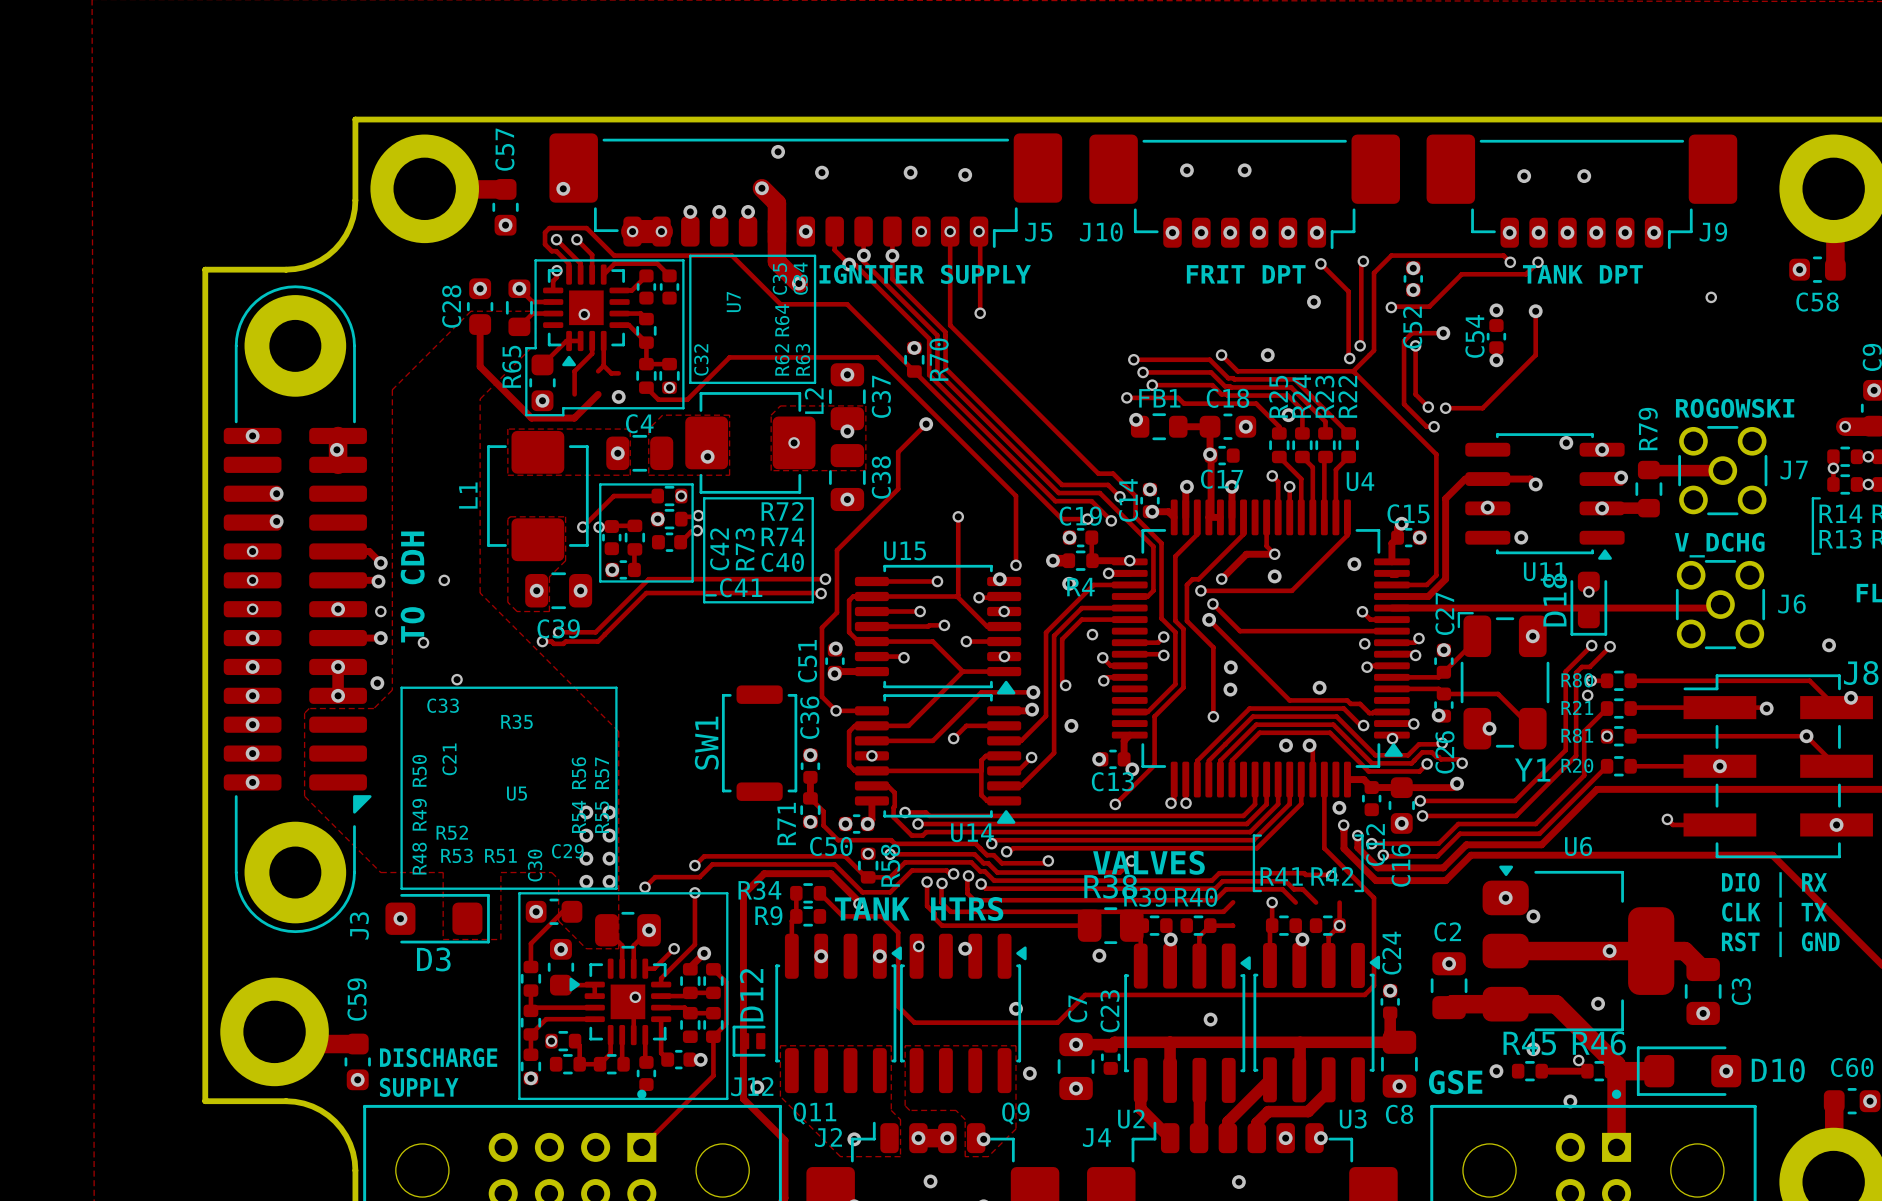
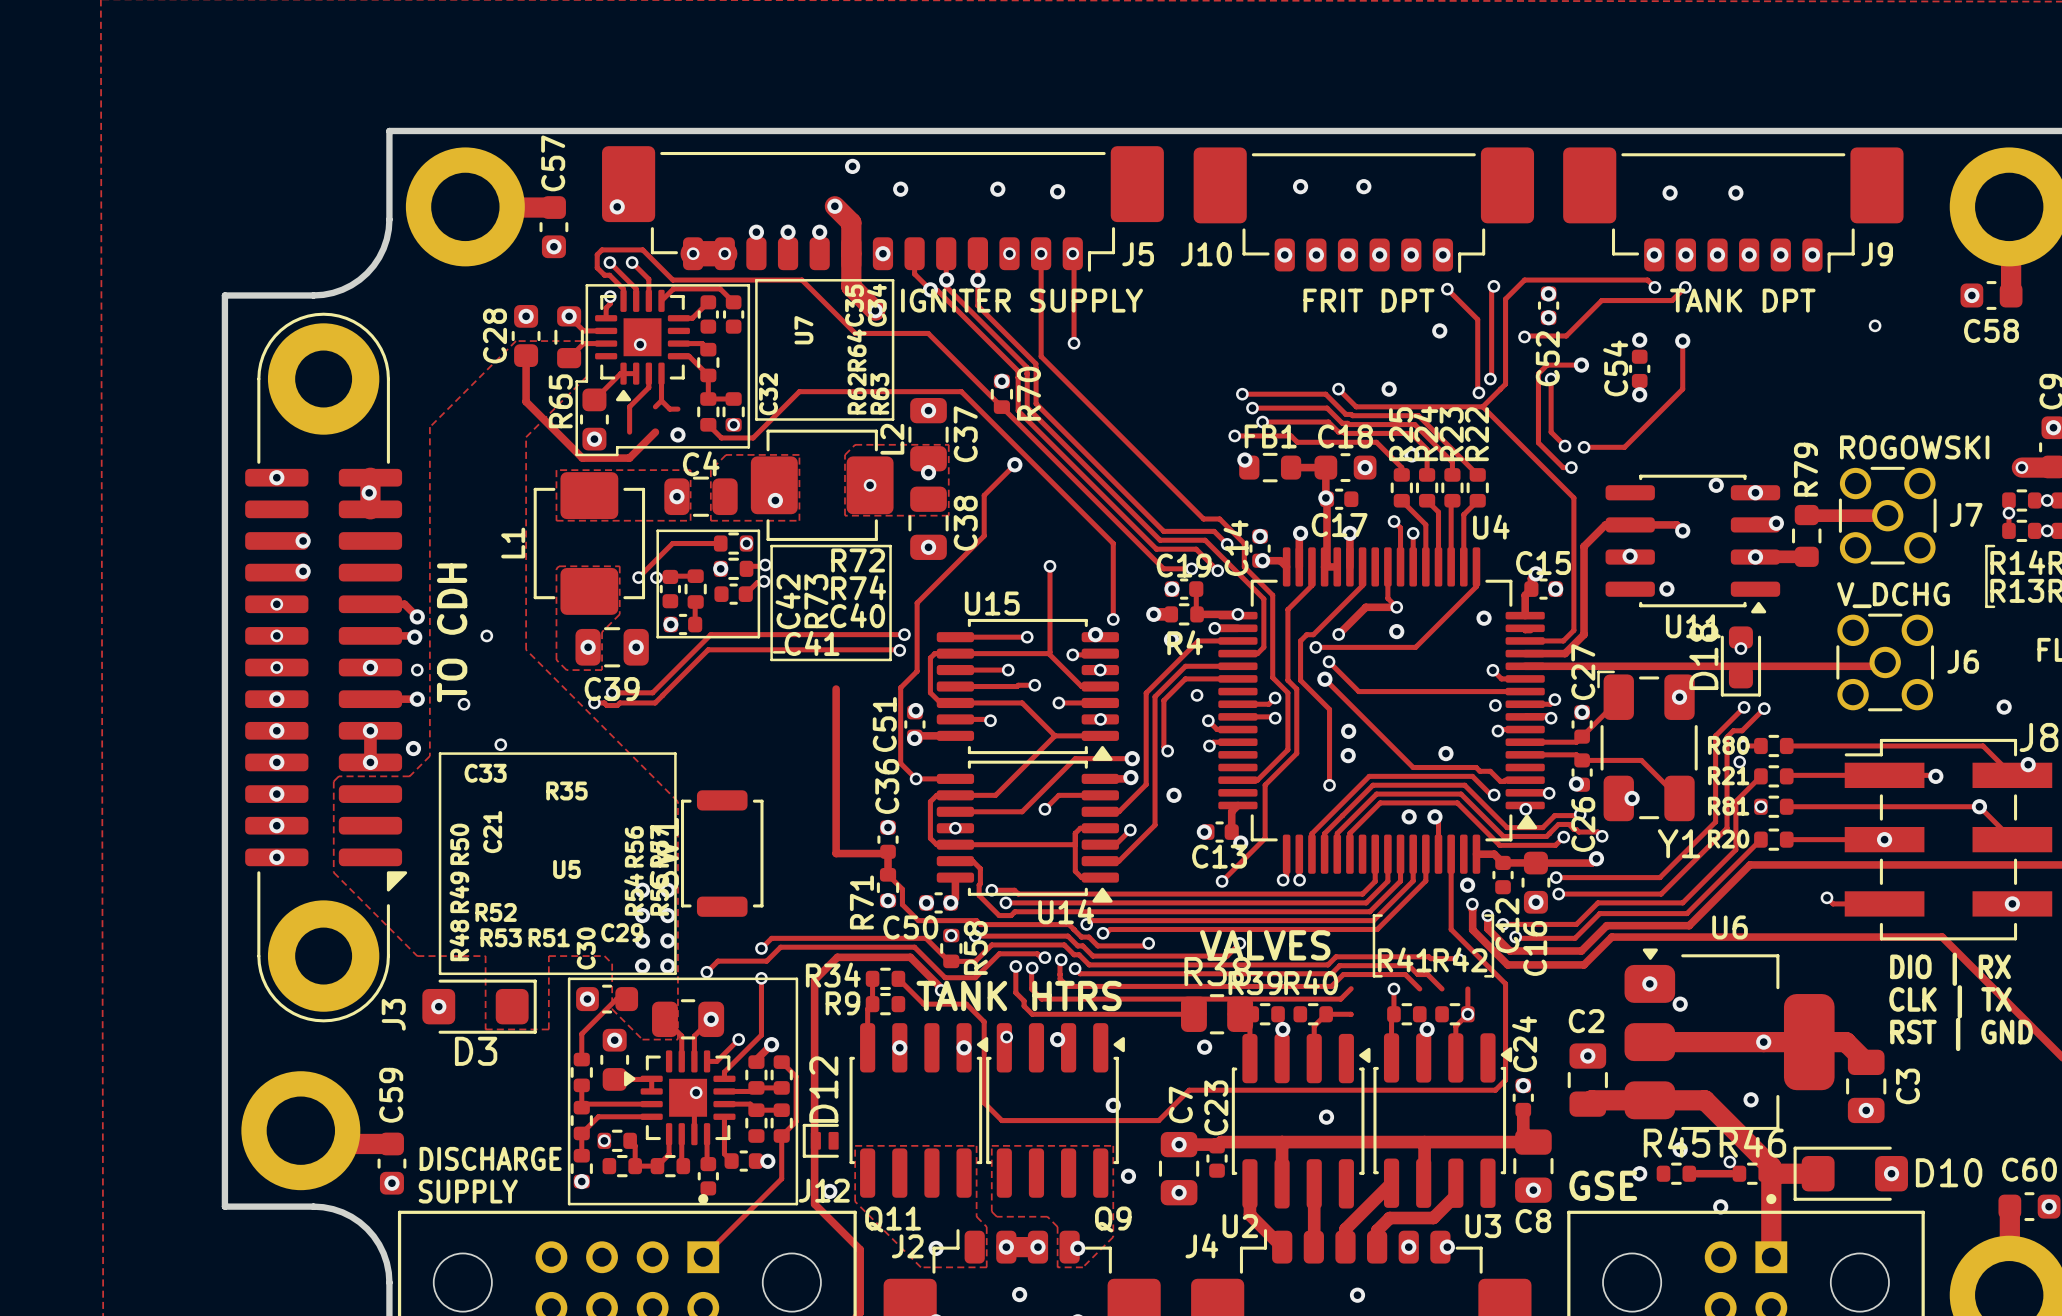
track: none -> (836, 689) (836, 853) (886, 853)
SW1 position: (759, 743) -> (722, 853)

